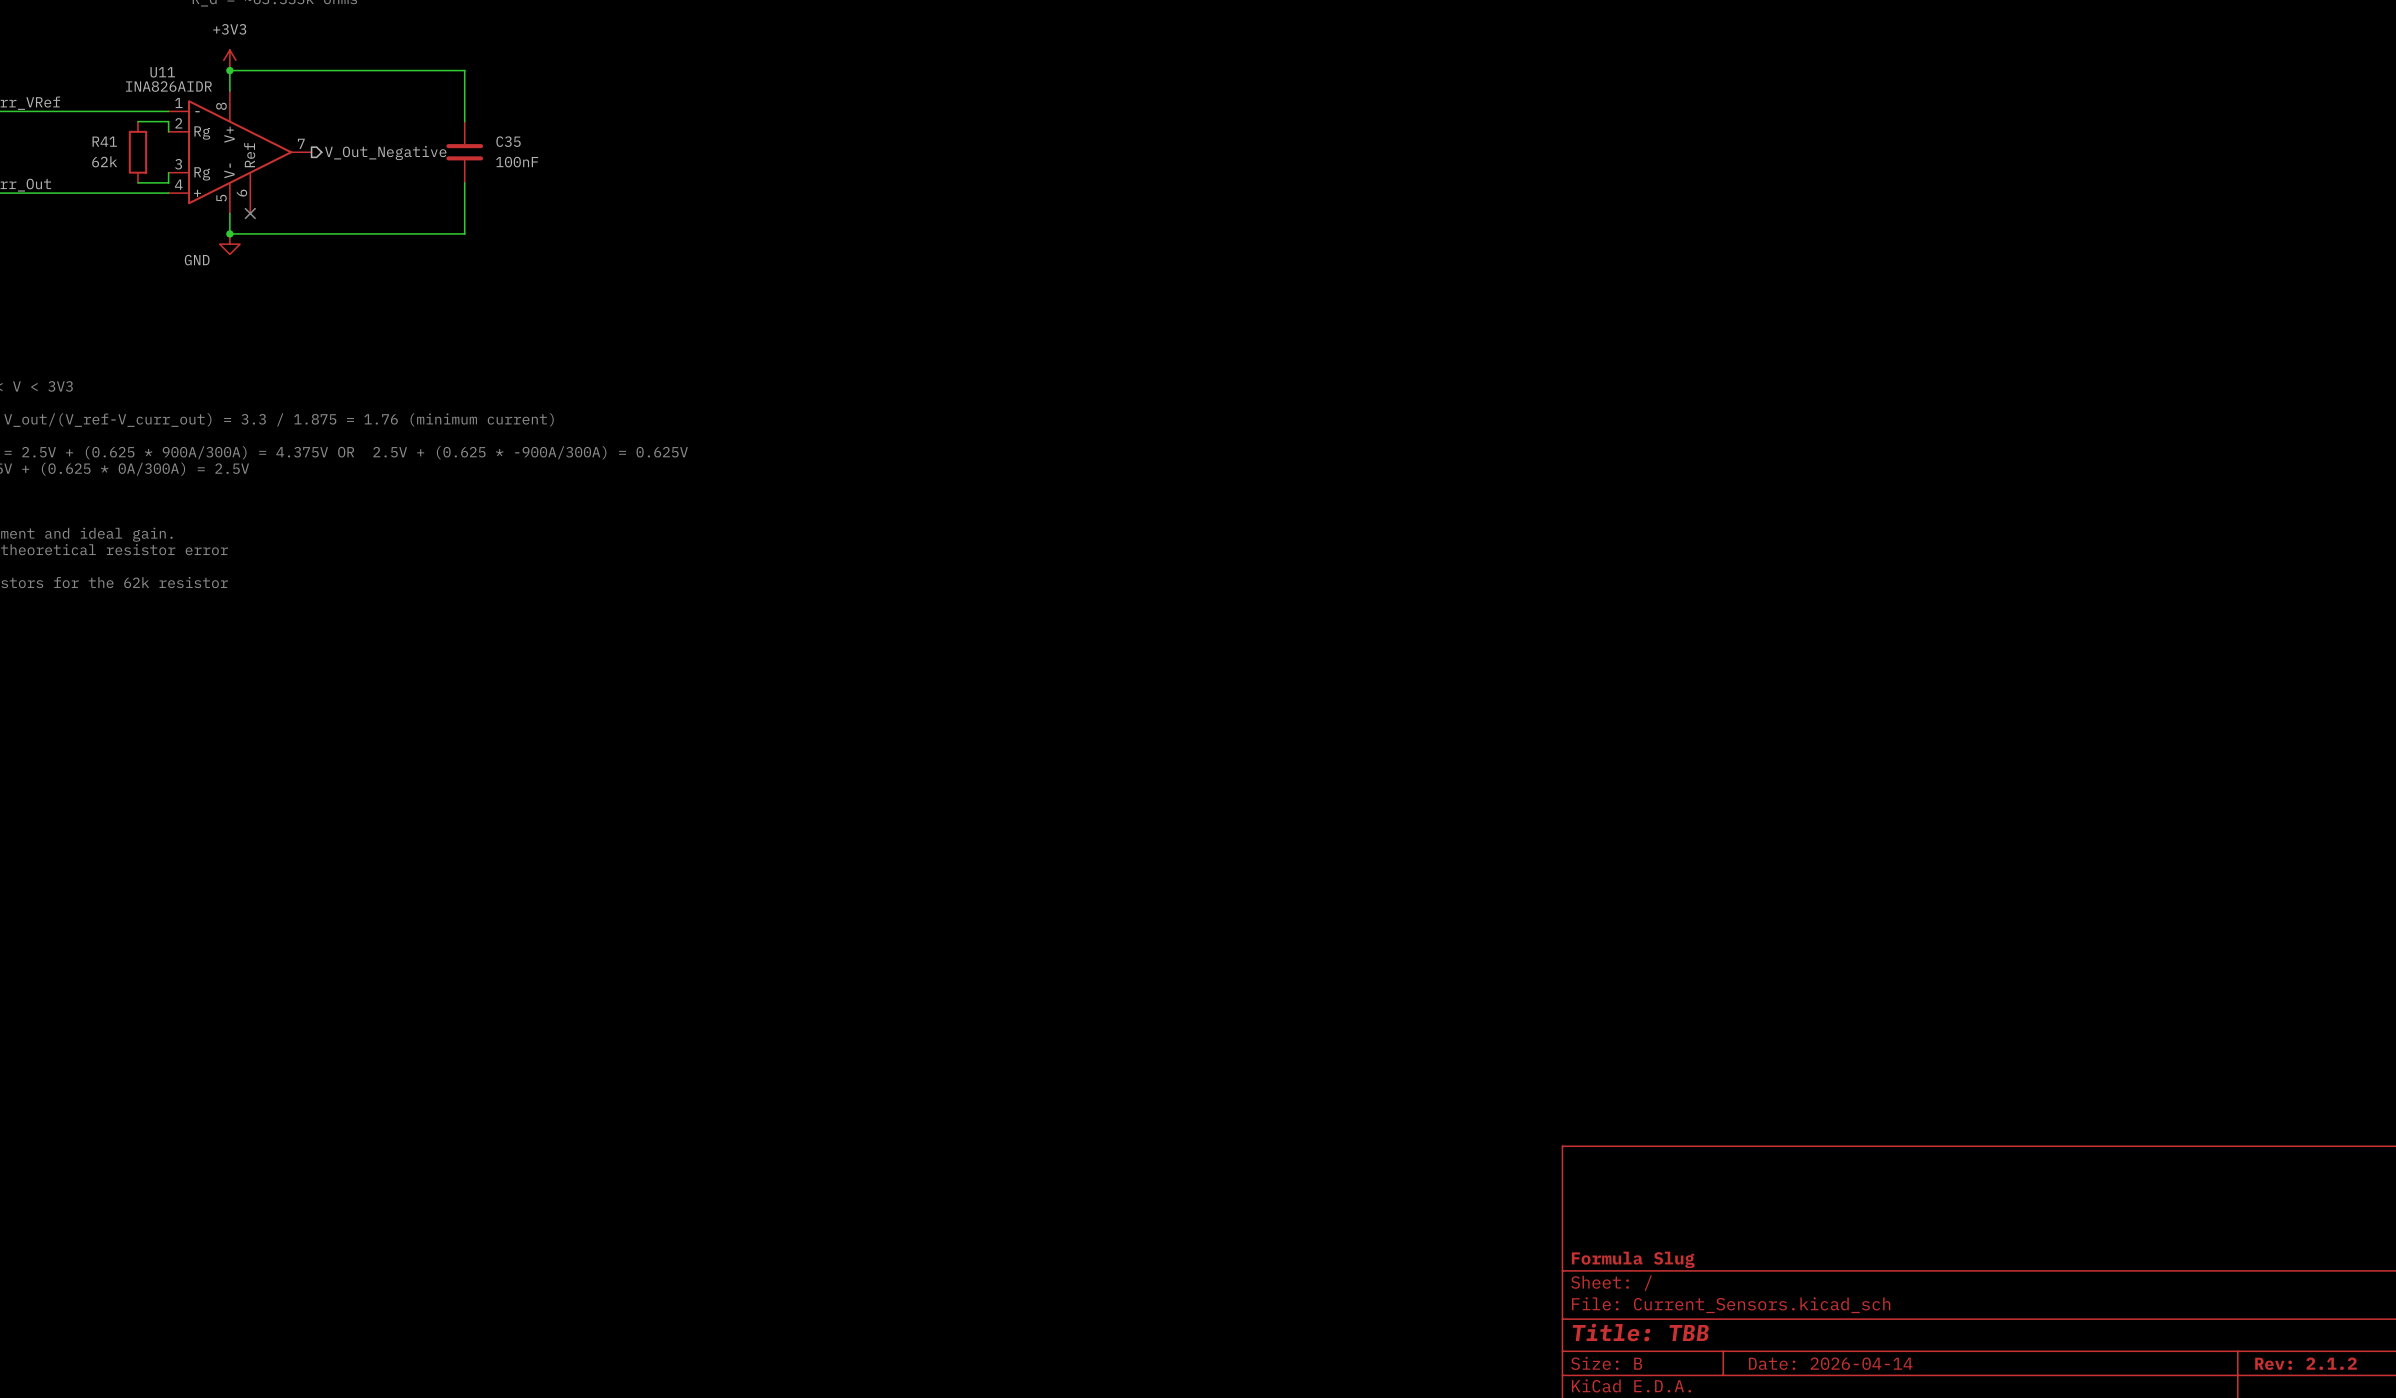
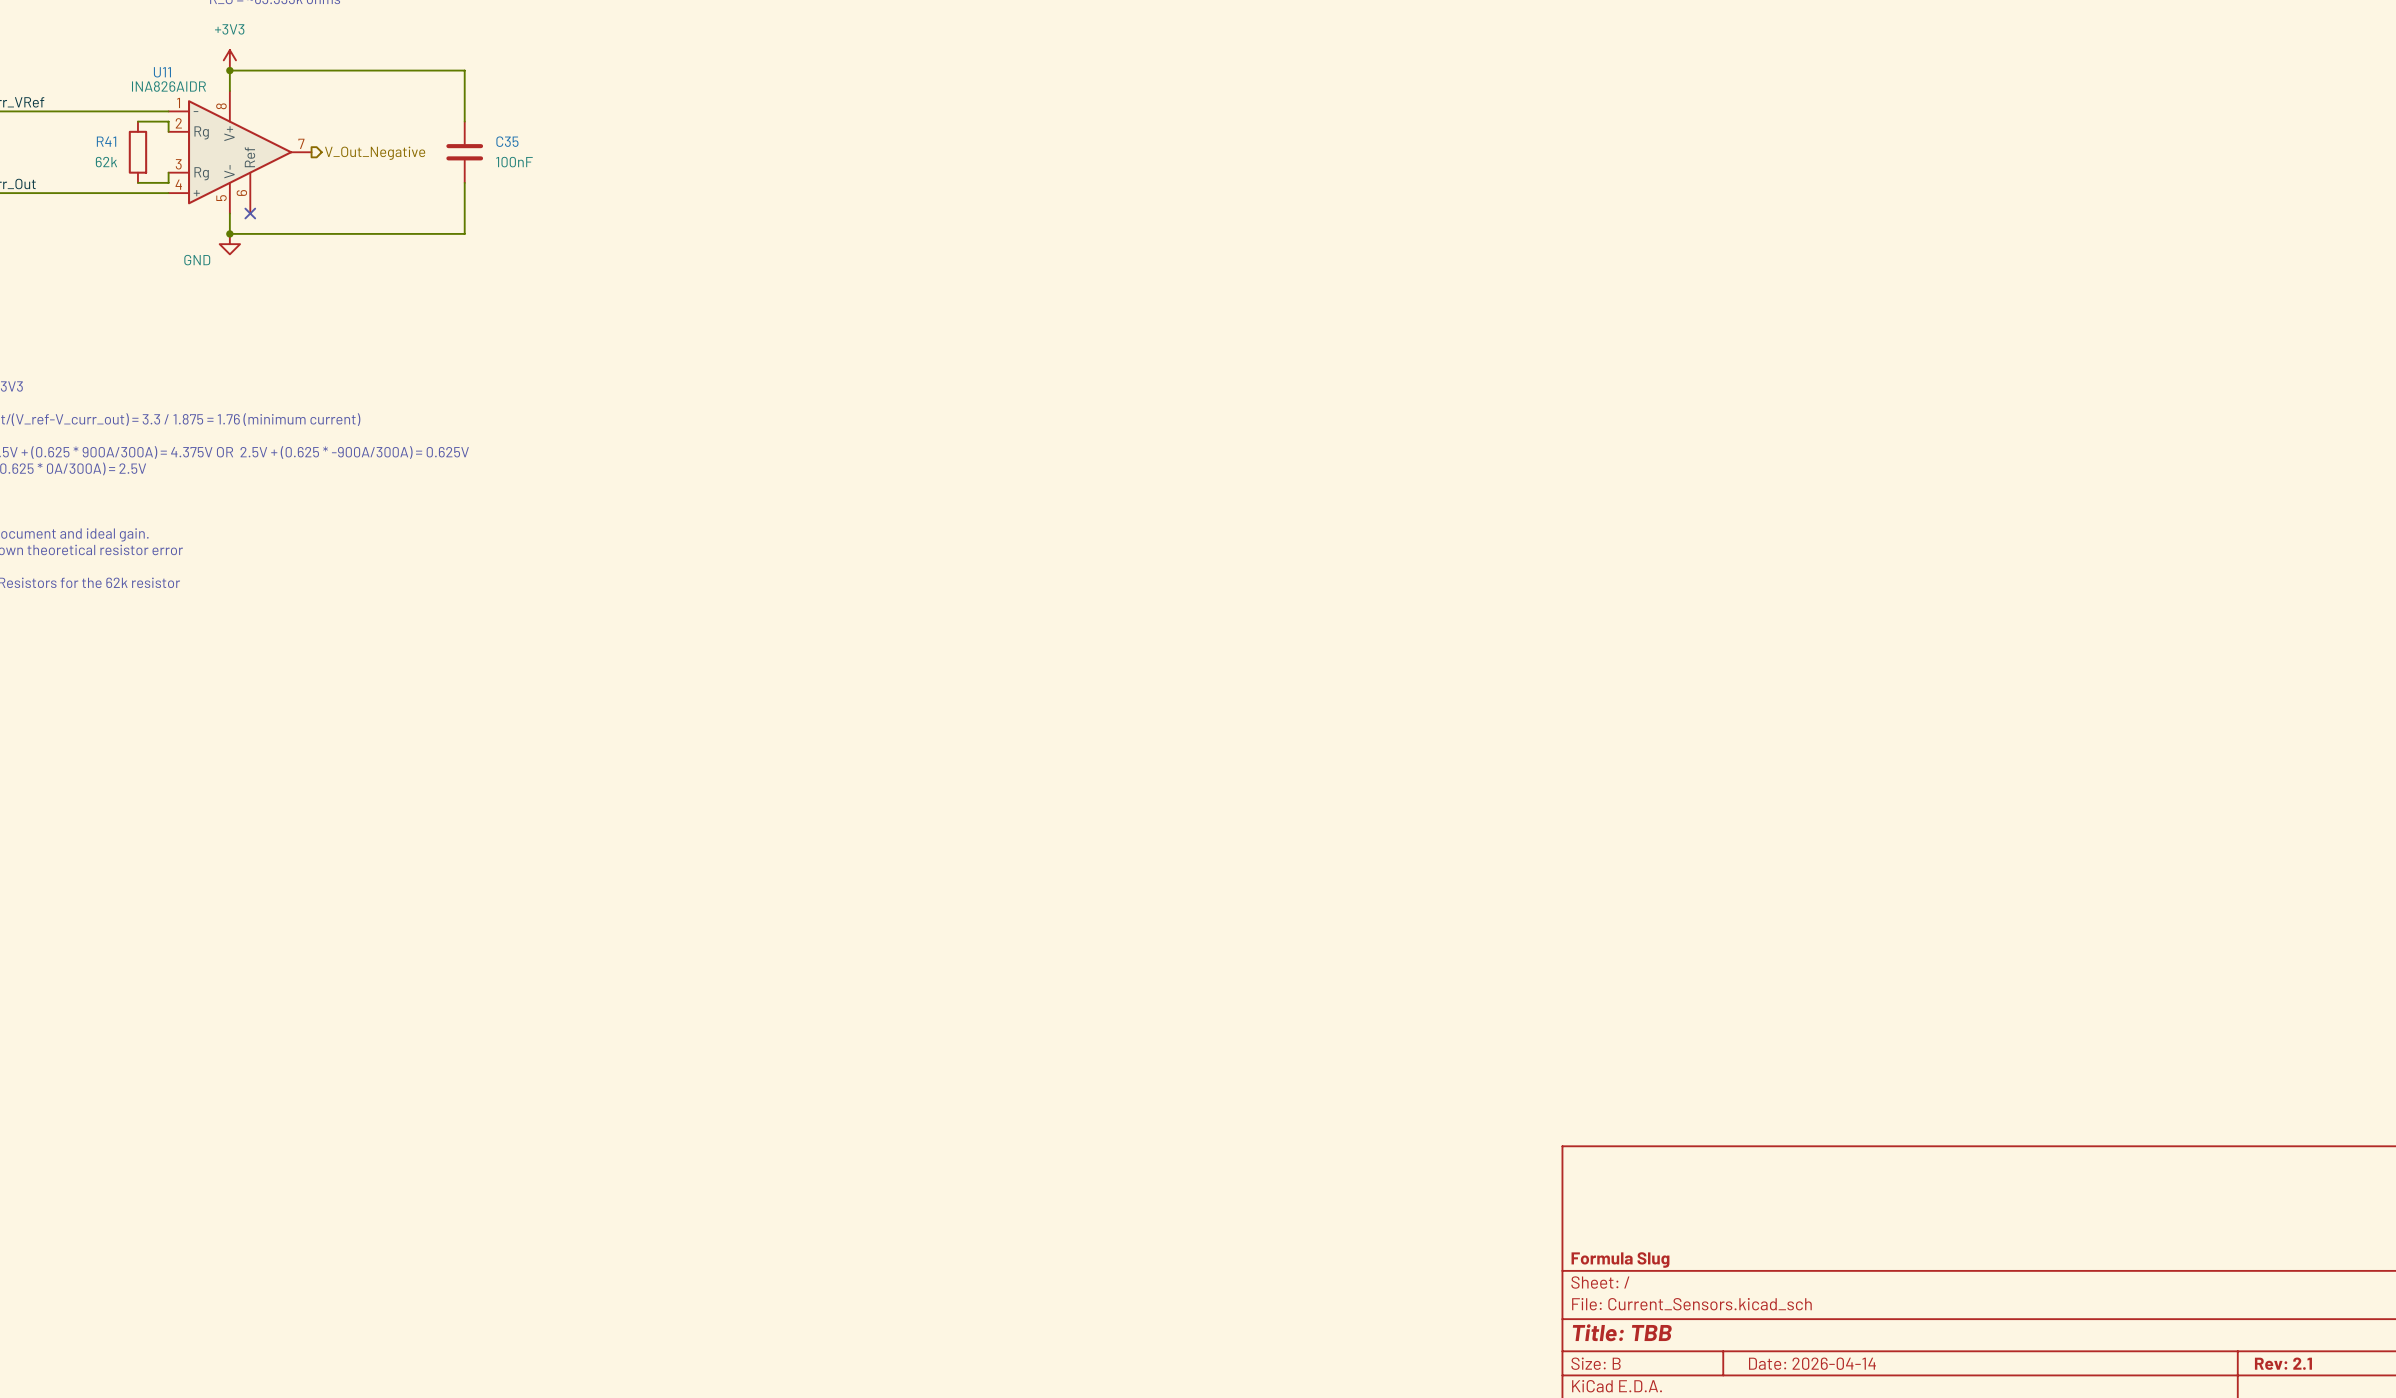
title block: Rev: 2.1.2 (2305, 1363) -> Rev: 2.1 (2283, 1363)

